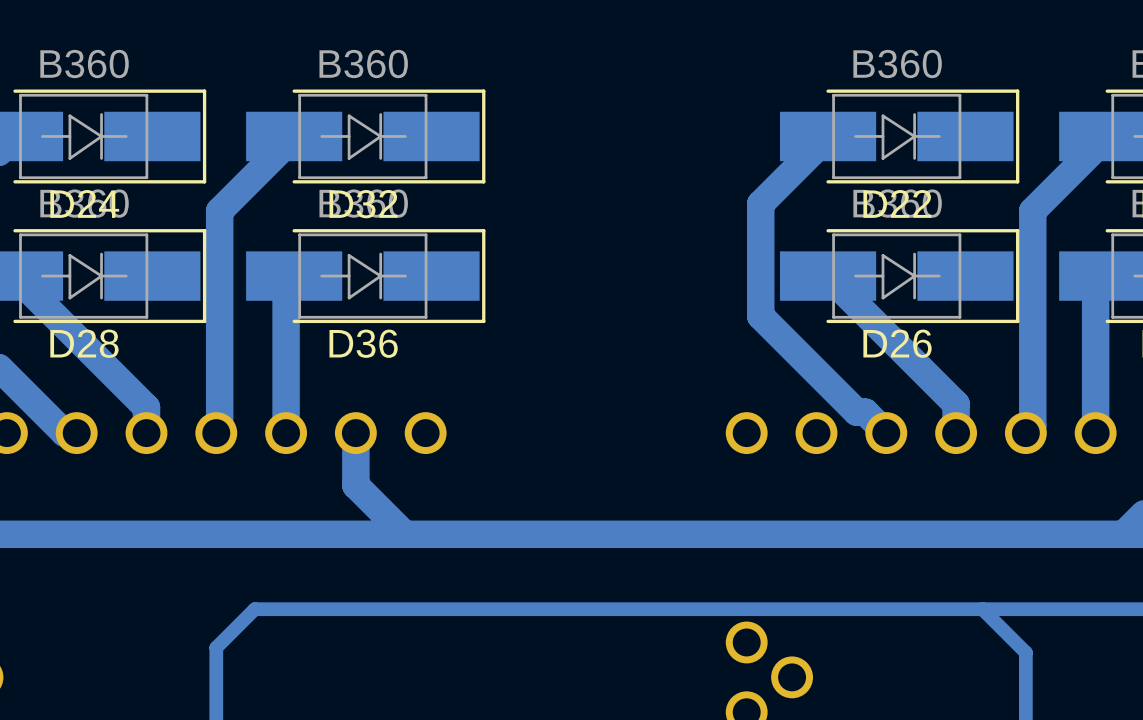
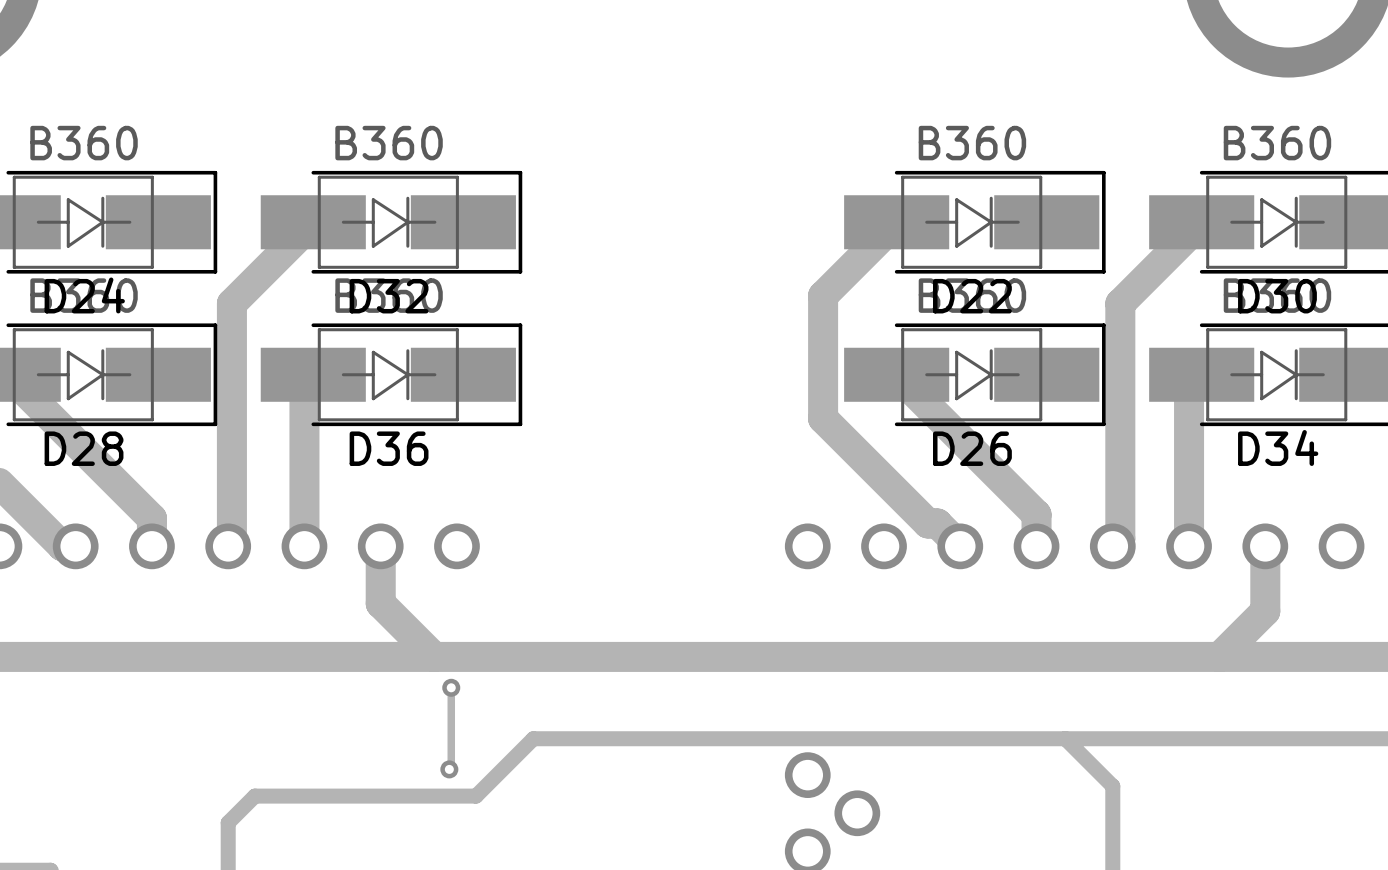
track: none -> (451, 687) (451, 767) (449, 769)
via: none -> (451, 687)
track: (495, 609) (254, 609) (216, 647) (216, 686) -> (533, 738) (476, 796) (254, 796) (228, 822)
via: none -> (449, 769)

